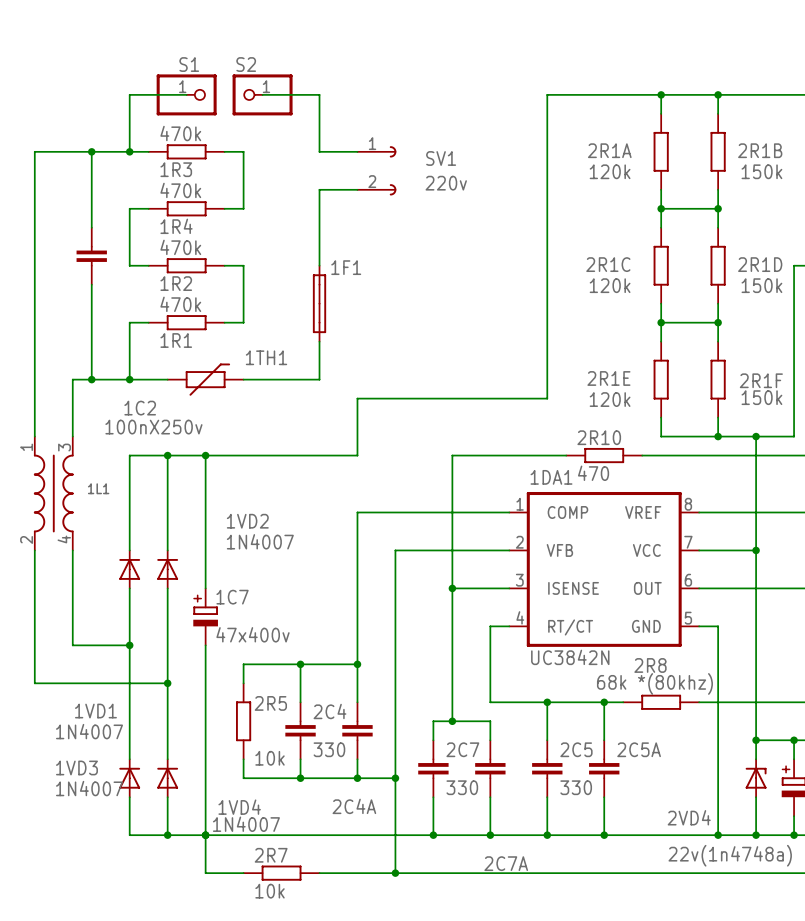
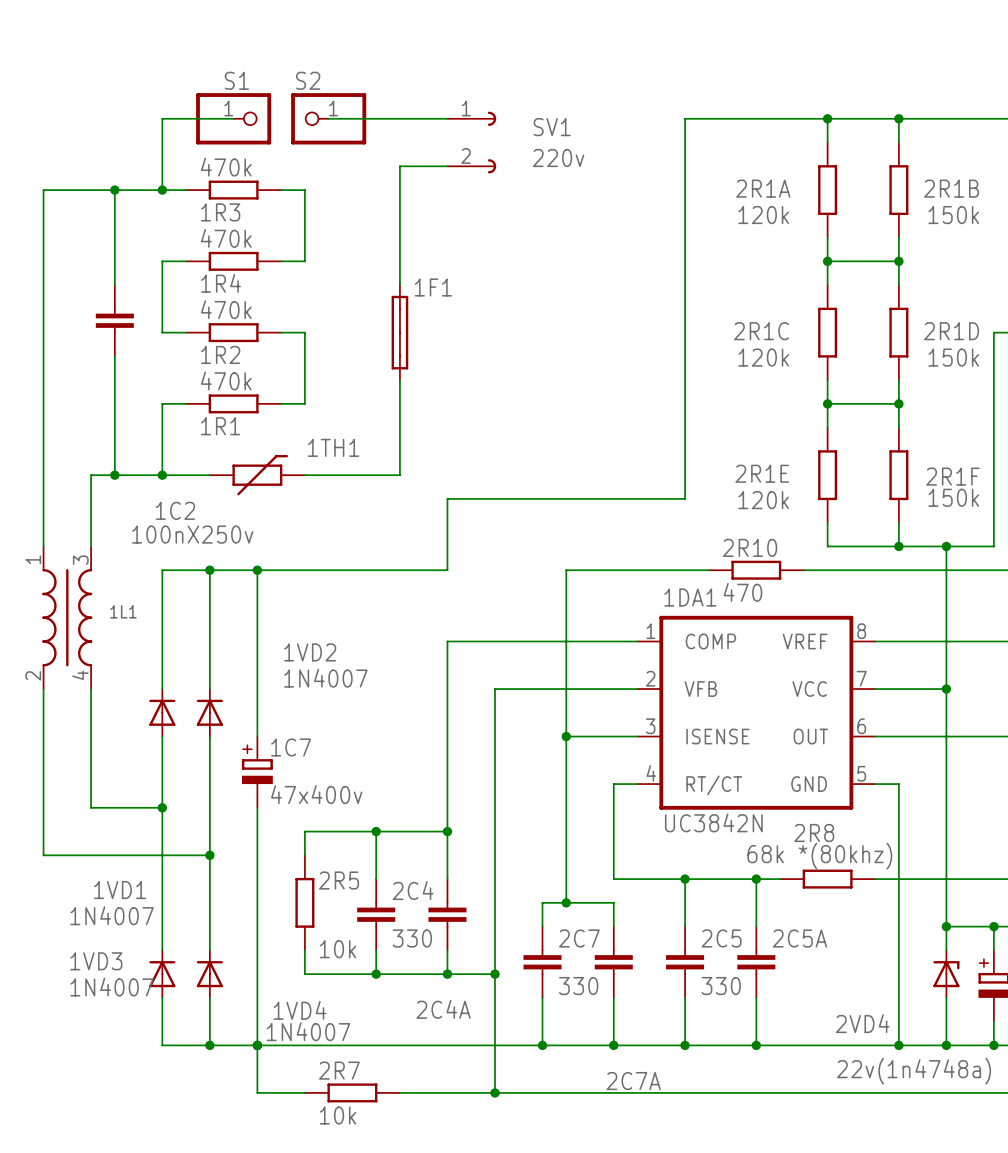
wire: (319, 94) (319, 132) -> (399, 118) (447, 118)
wire: (319, 151) (357, 151) -> (399, 190) (399, 237)
SV1 position: (376, 170) -> (471, 142)
wire: (319, 189) (357, 189) -> (399, 166) (447, 166)
1F1 position: (319, 303) -> (399, 332)

